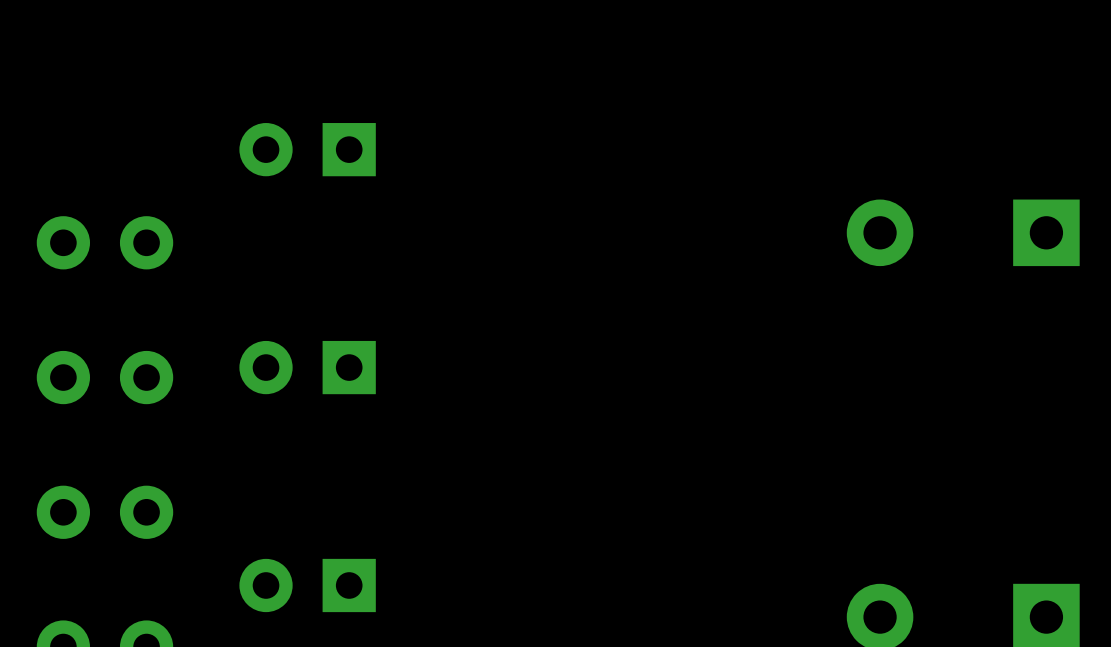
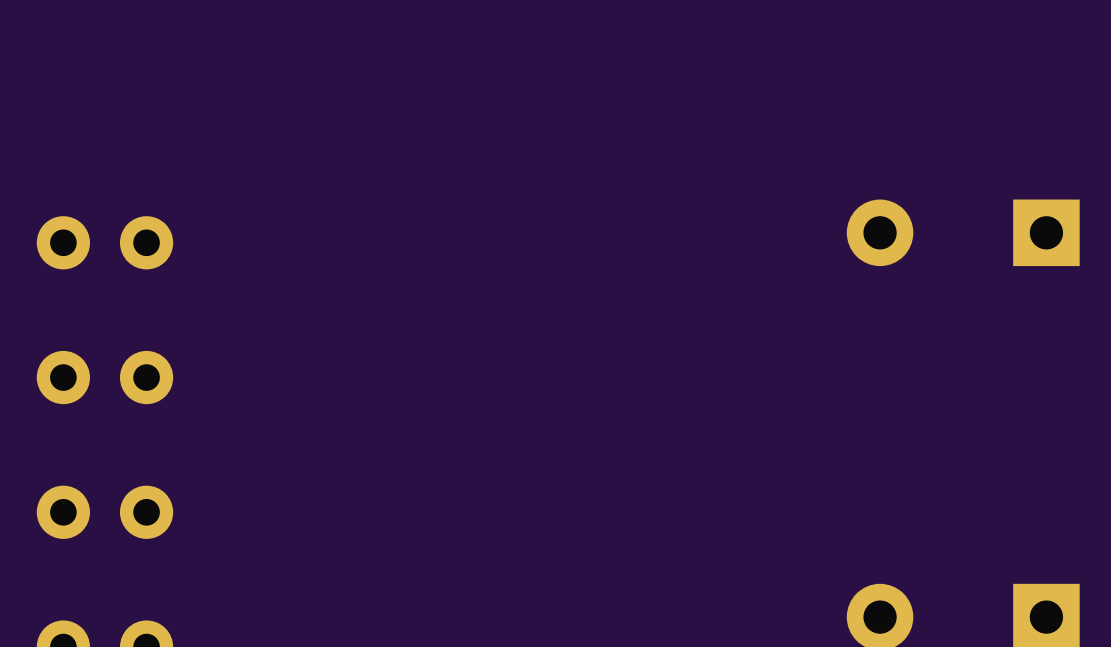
part: (307, 149) -> none
part: (307, 367) -> none
part: (307, 585) -> none

